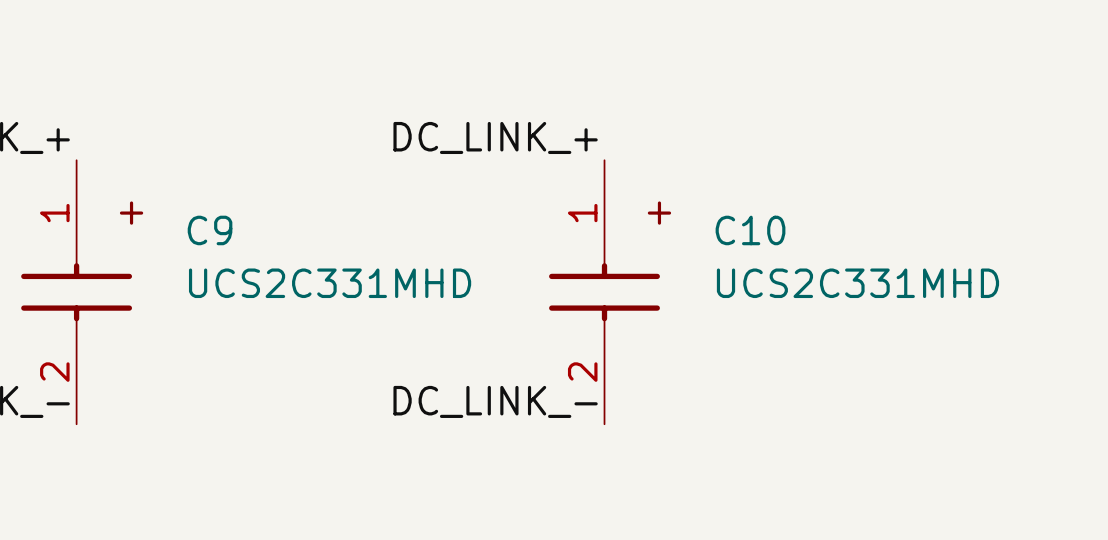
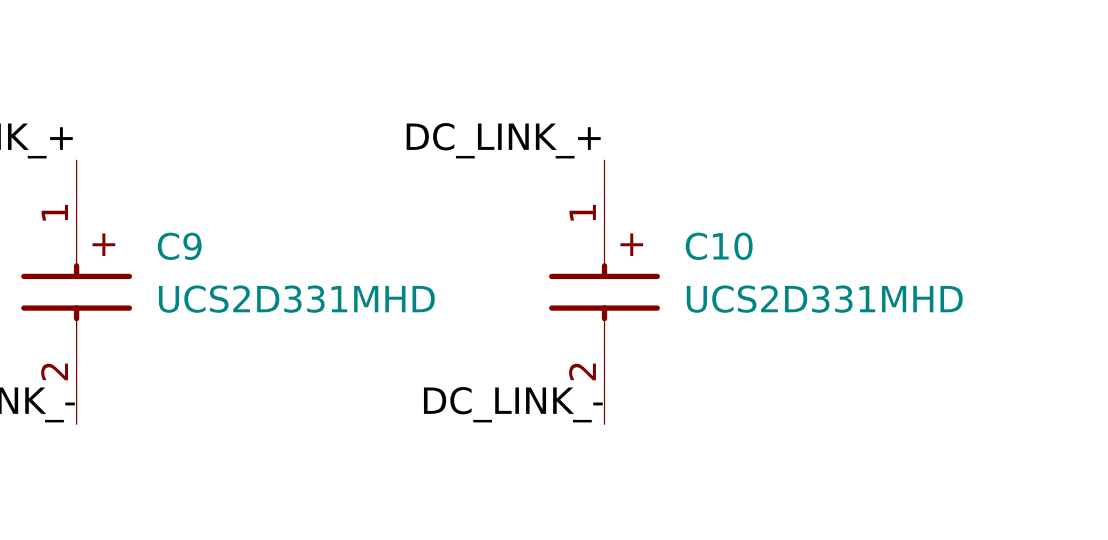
C9 text position: + (131, 213) -> + (103, 244)
C10 text position: + (659, 213) -> + (631, 244)
C9 name position: C9 (210, 230) -> C9 (179, 246)
C10 name position: C10 (750, 230) -> C10 (719, 246)
C9 value: UCS2C331MHD (330, 283) -> UCS2D331MHD (296, 299)
C10 value: UCS2C331MHD (857, 283) -> UCS2D331MHD (824, 299)

